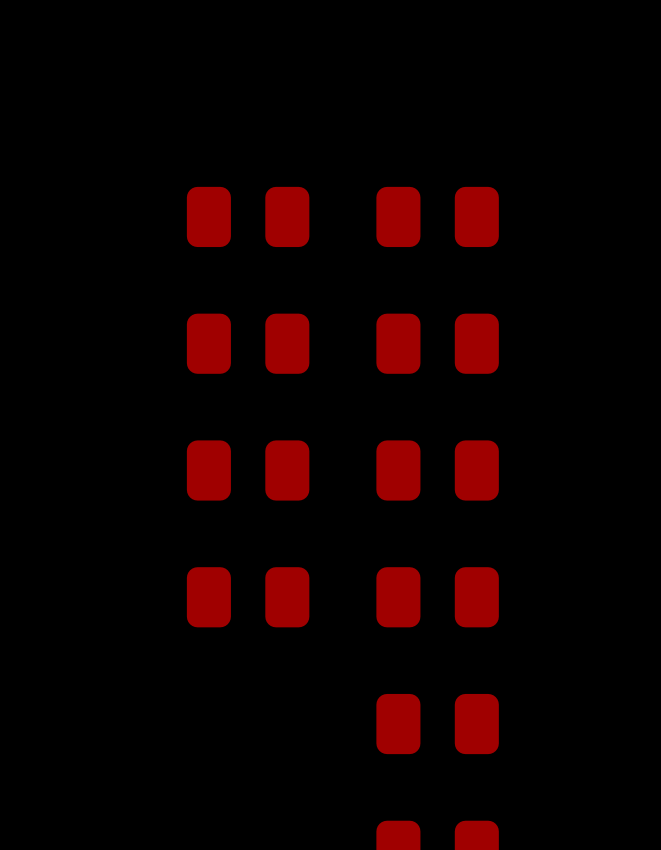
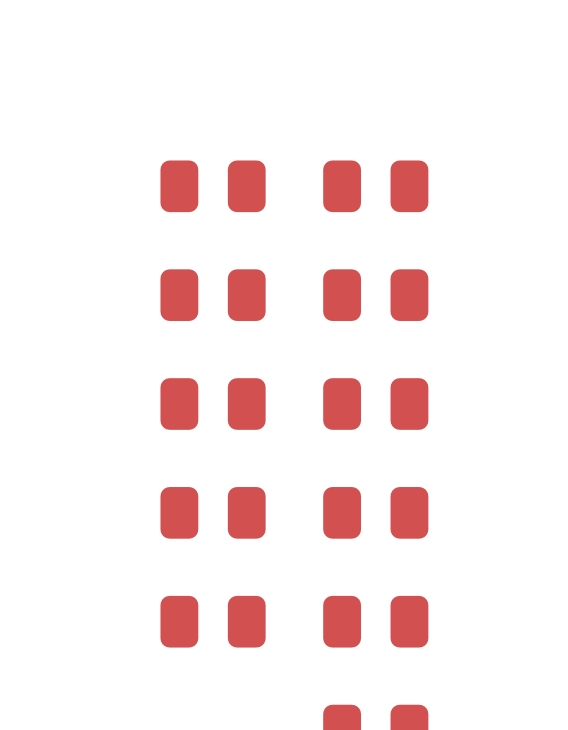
part: none -> (213, 621)

